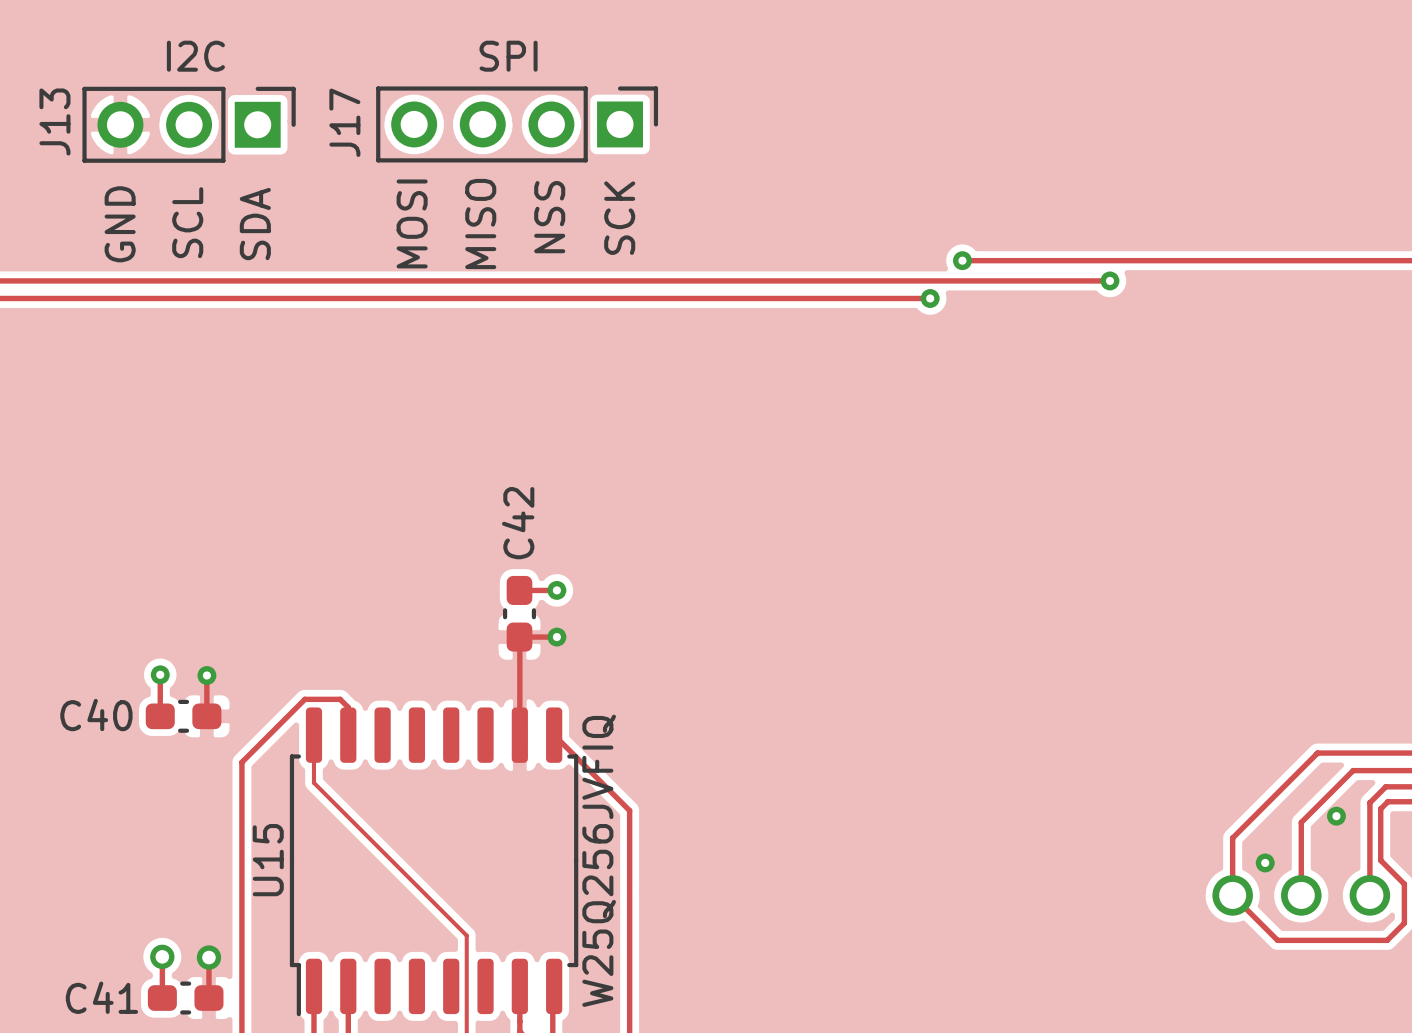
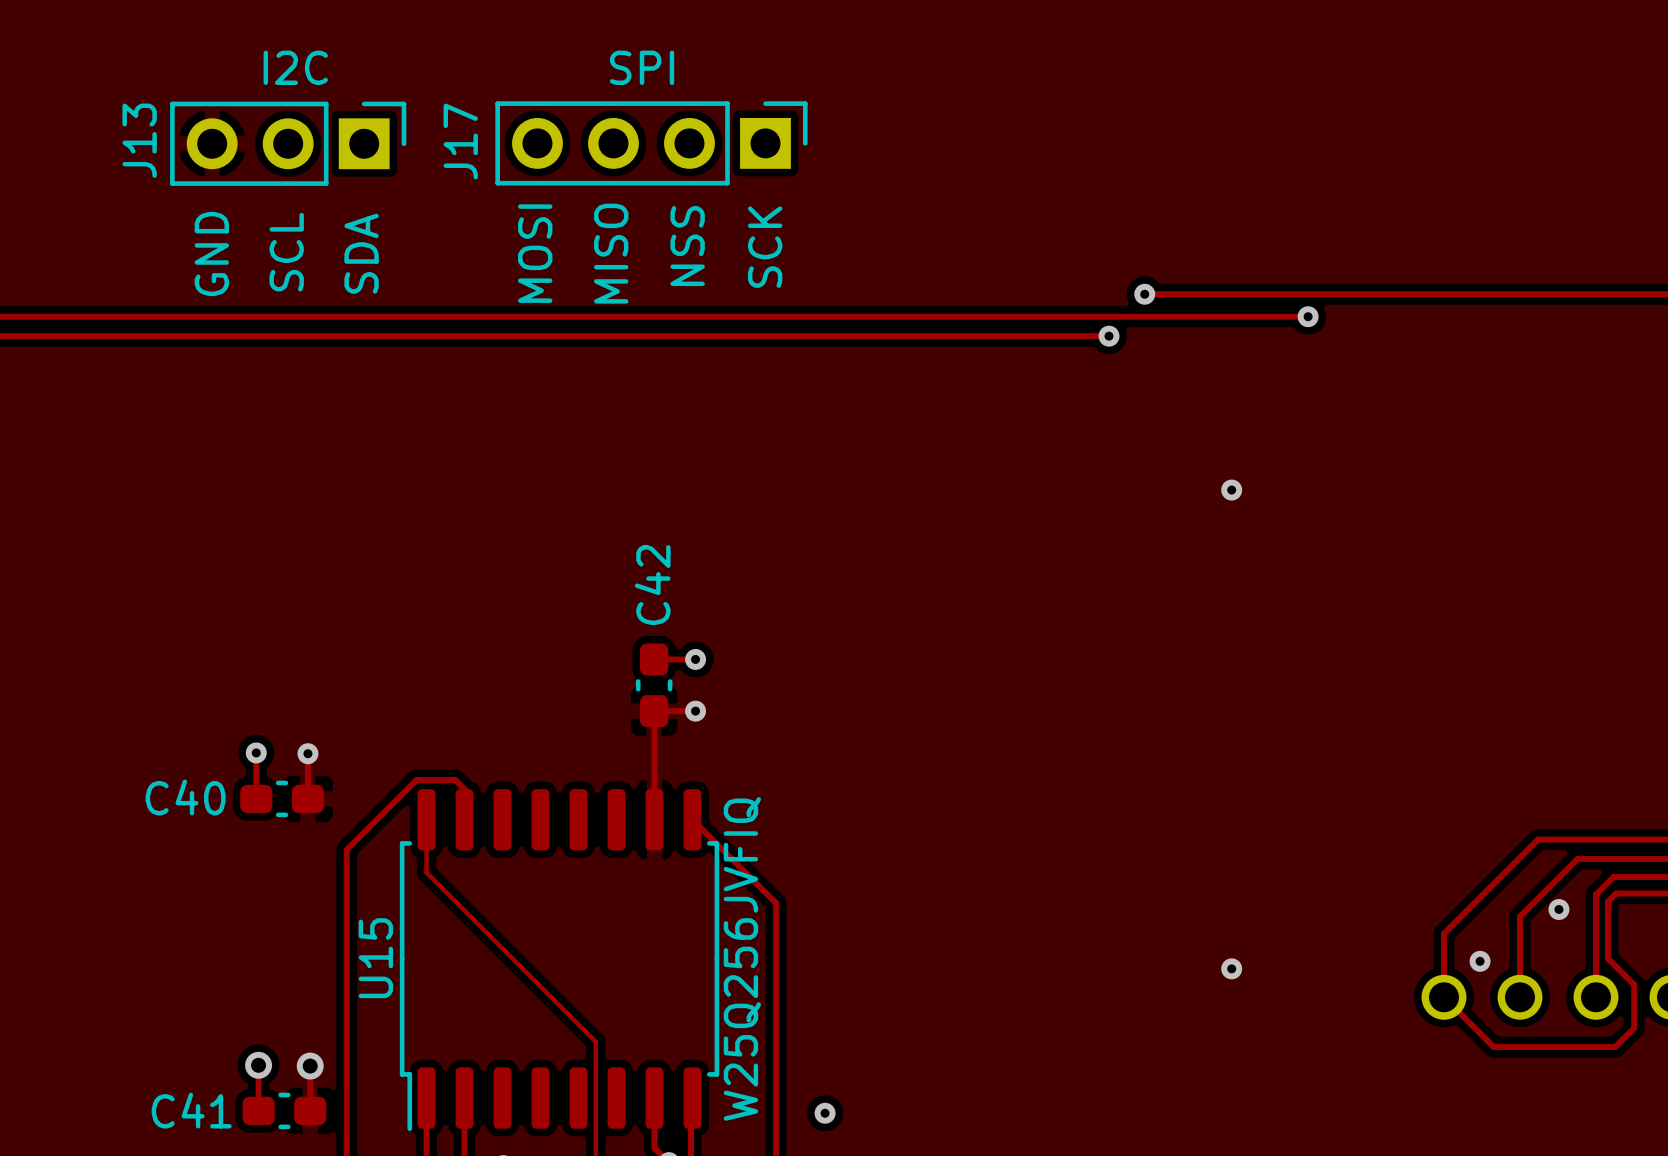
via: none -> (1231, 490)
via: none -> (1231, 968)
via: none -> (825, 1113)

